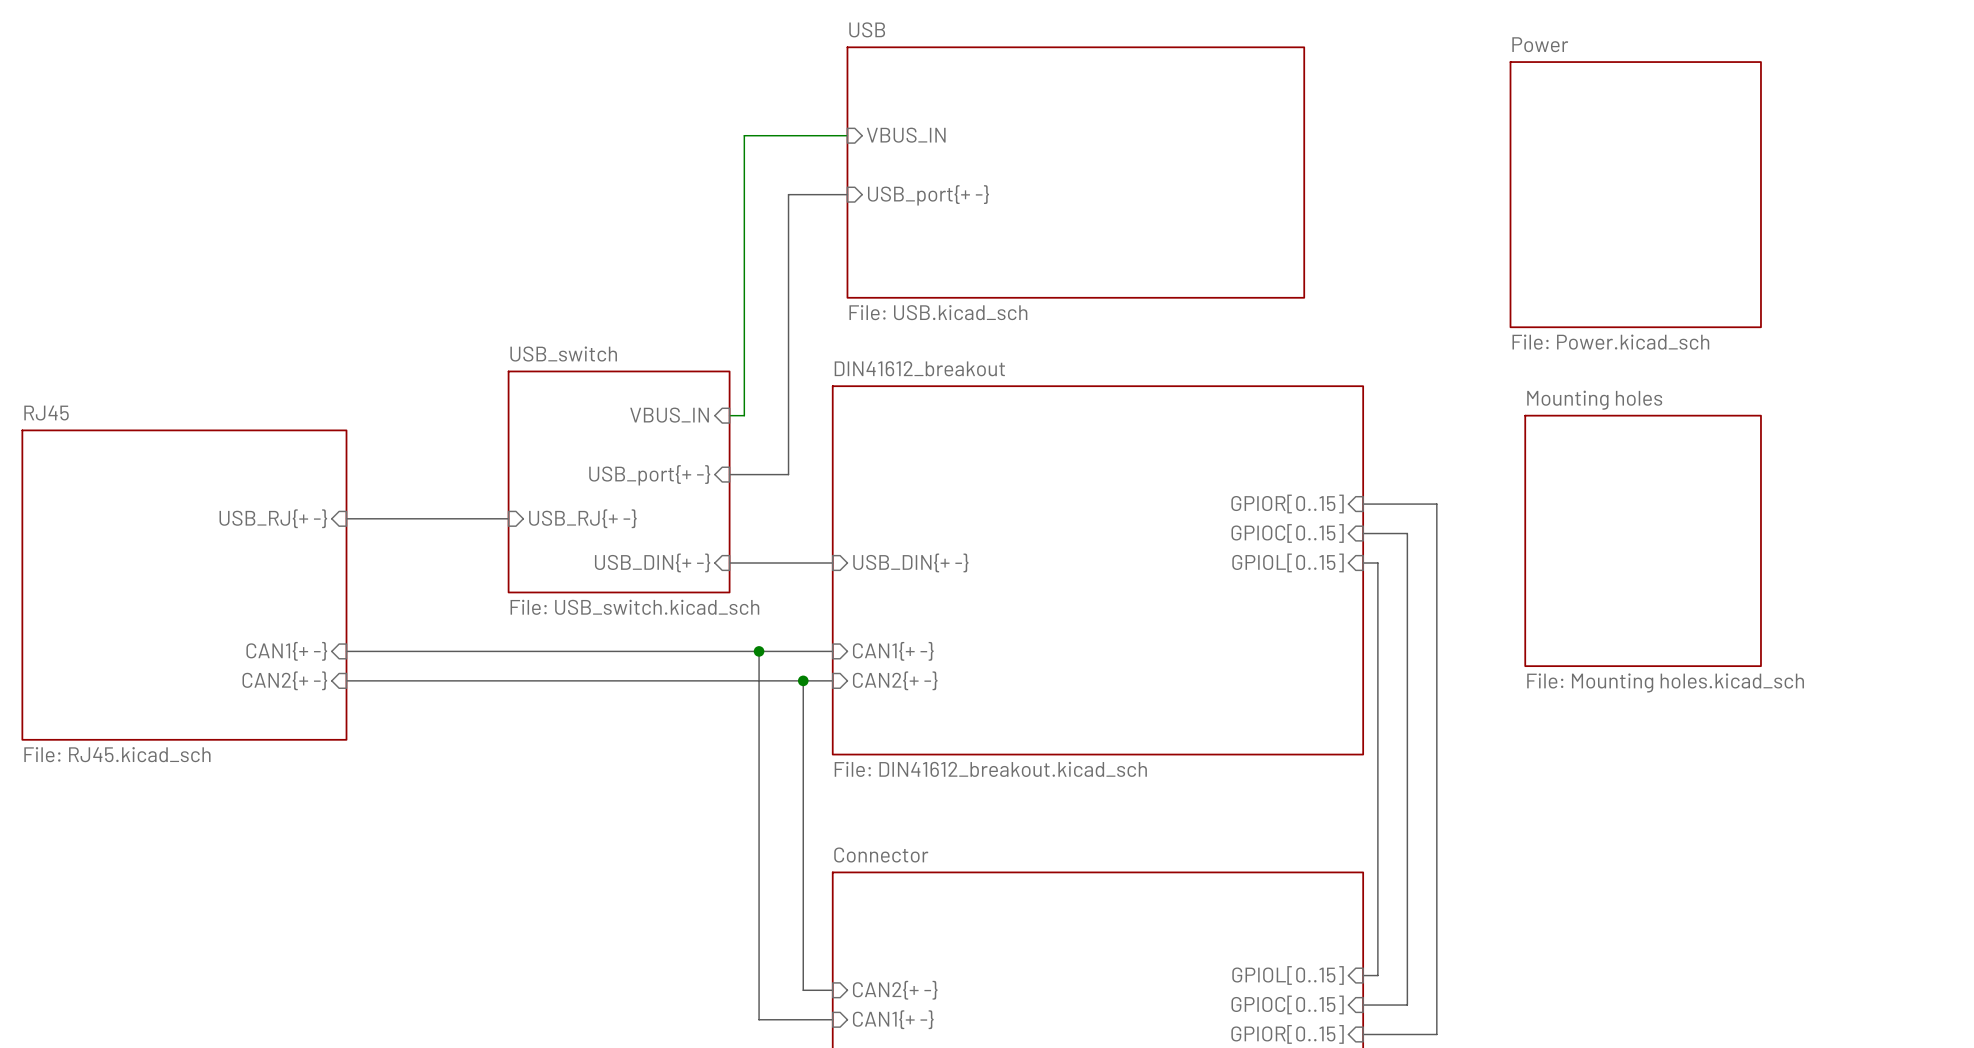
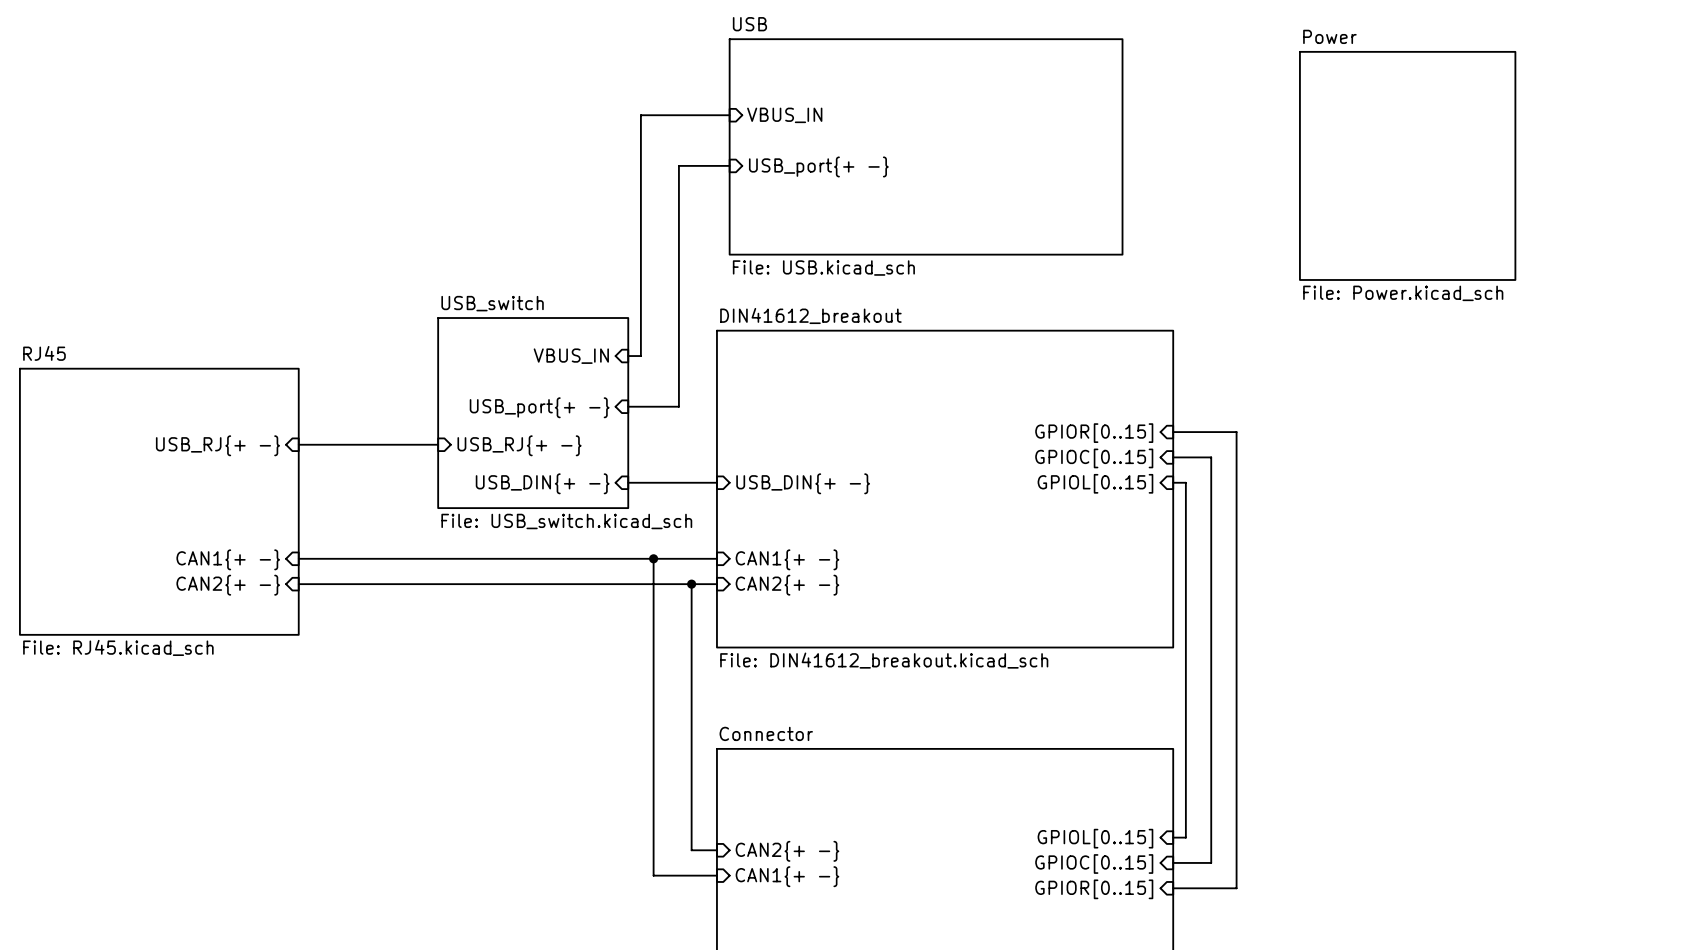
sheet Mounting holes: File: Mounting holes.kicad_sch (1643, 540) -> none

